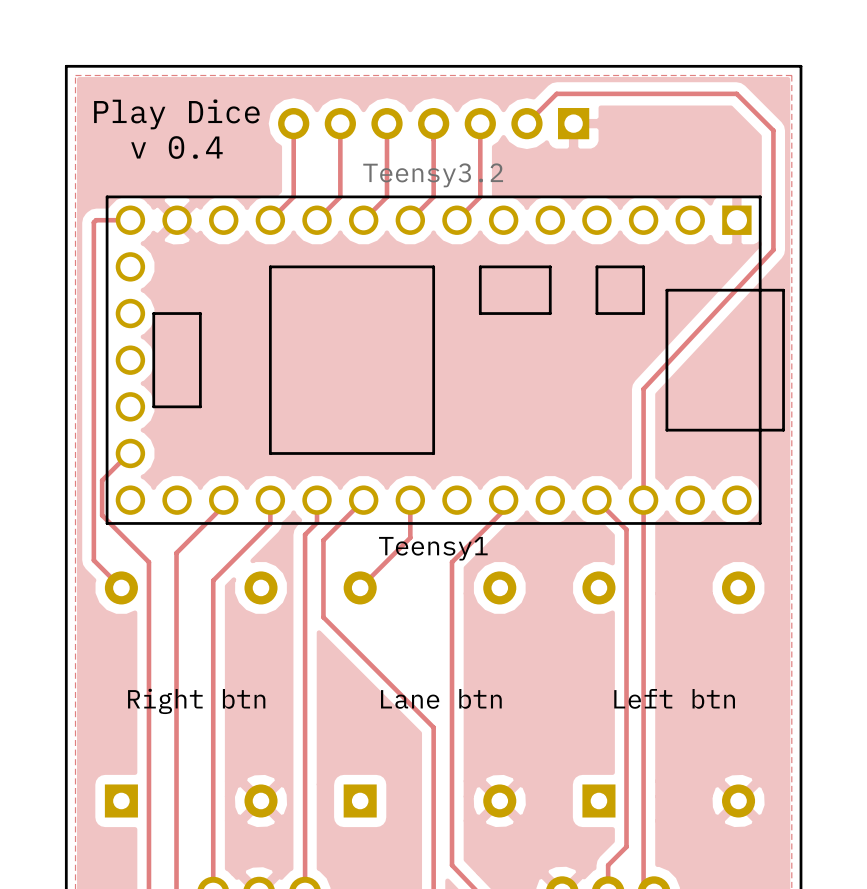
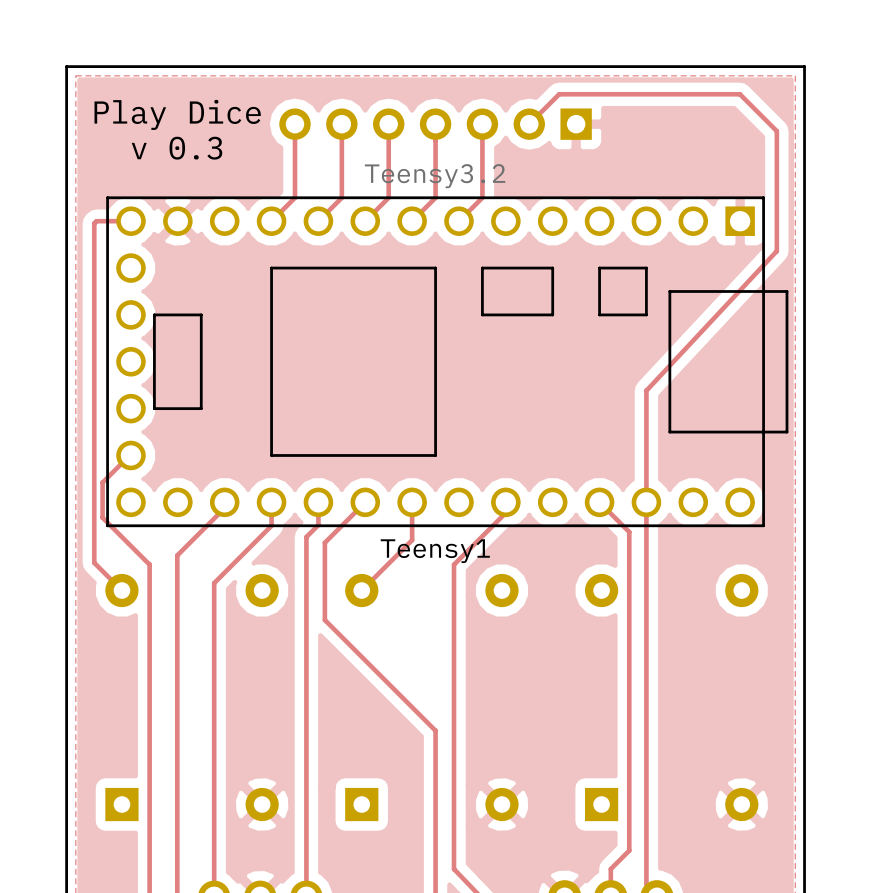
text: v 0.4 (176, 147) -> v 0.3 (177, 148)
text: Lane btn (441, 698) -> none
text: Left btn (674, 698) -> none
text: Right btn (196, 701) -> none

